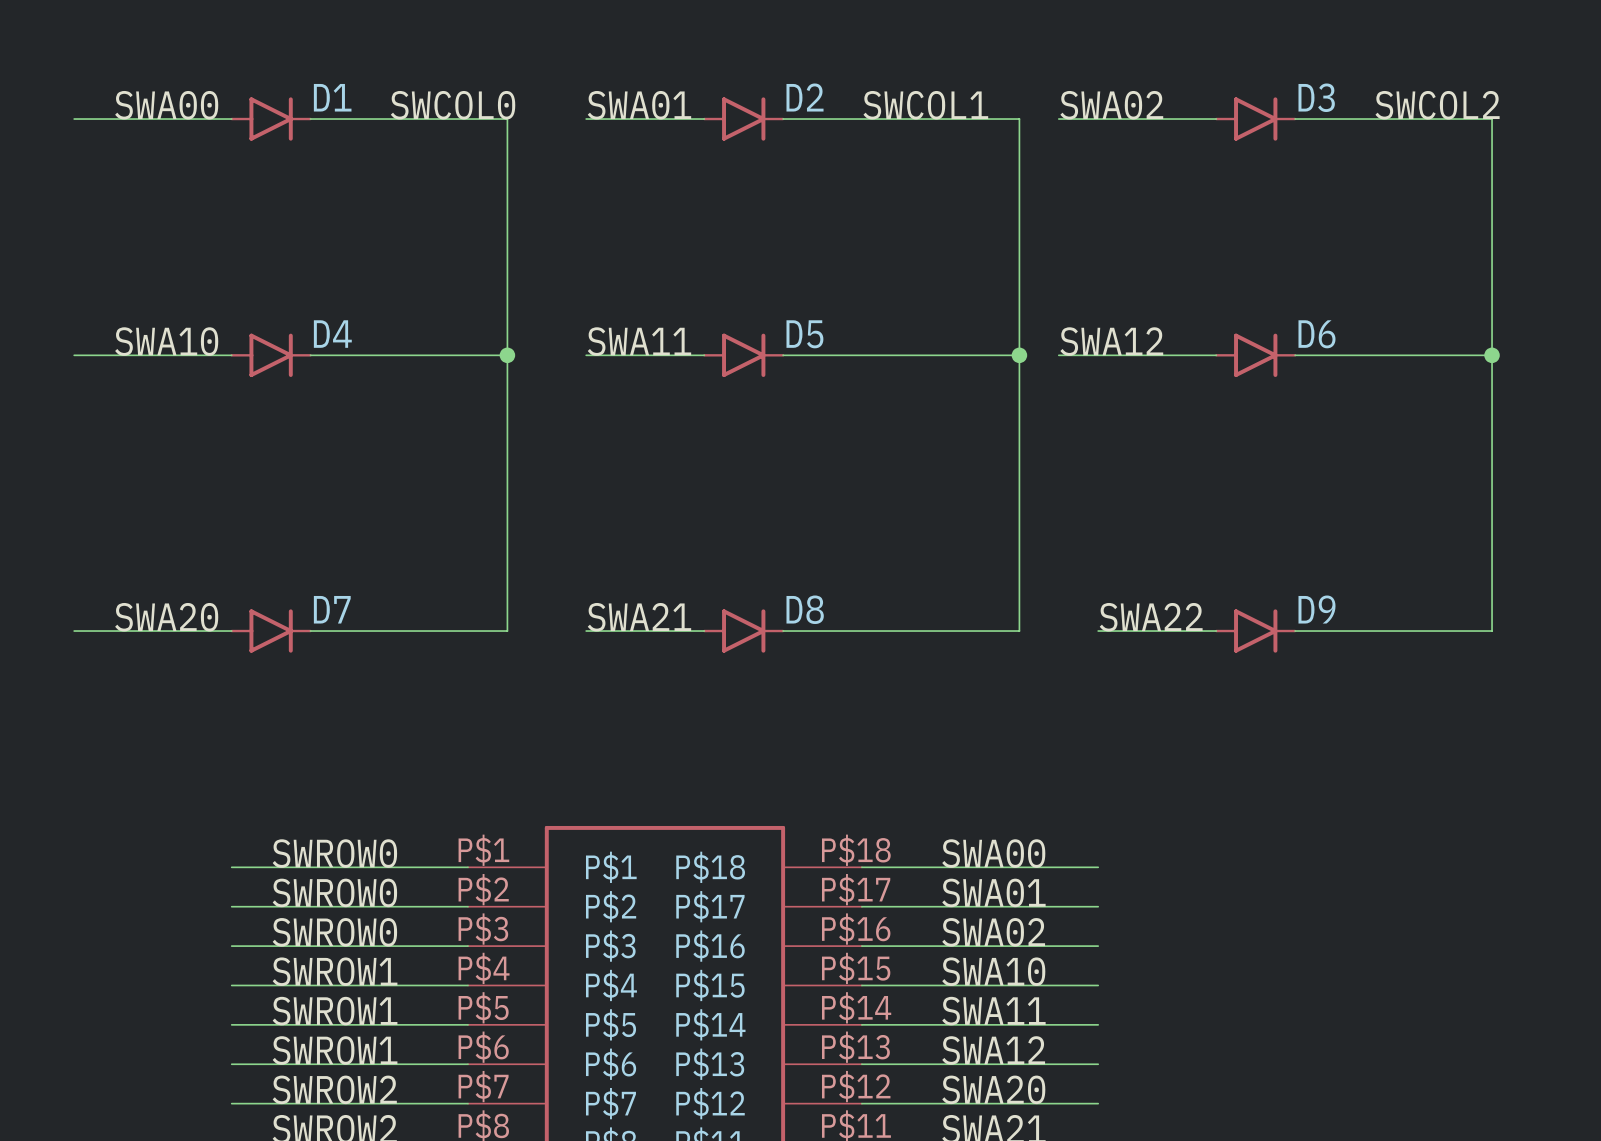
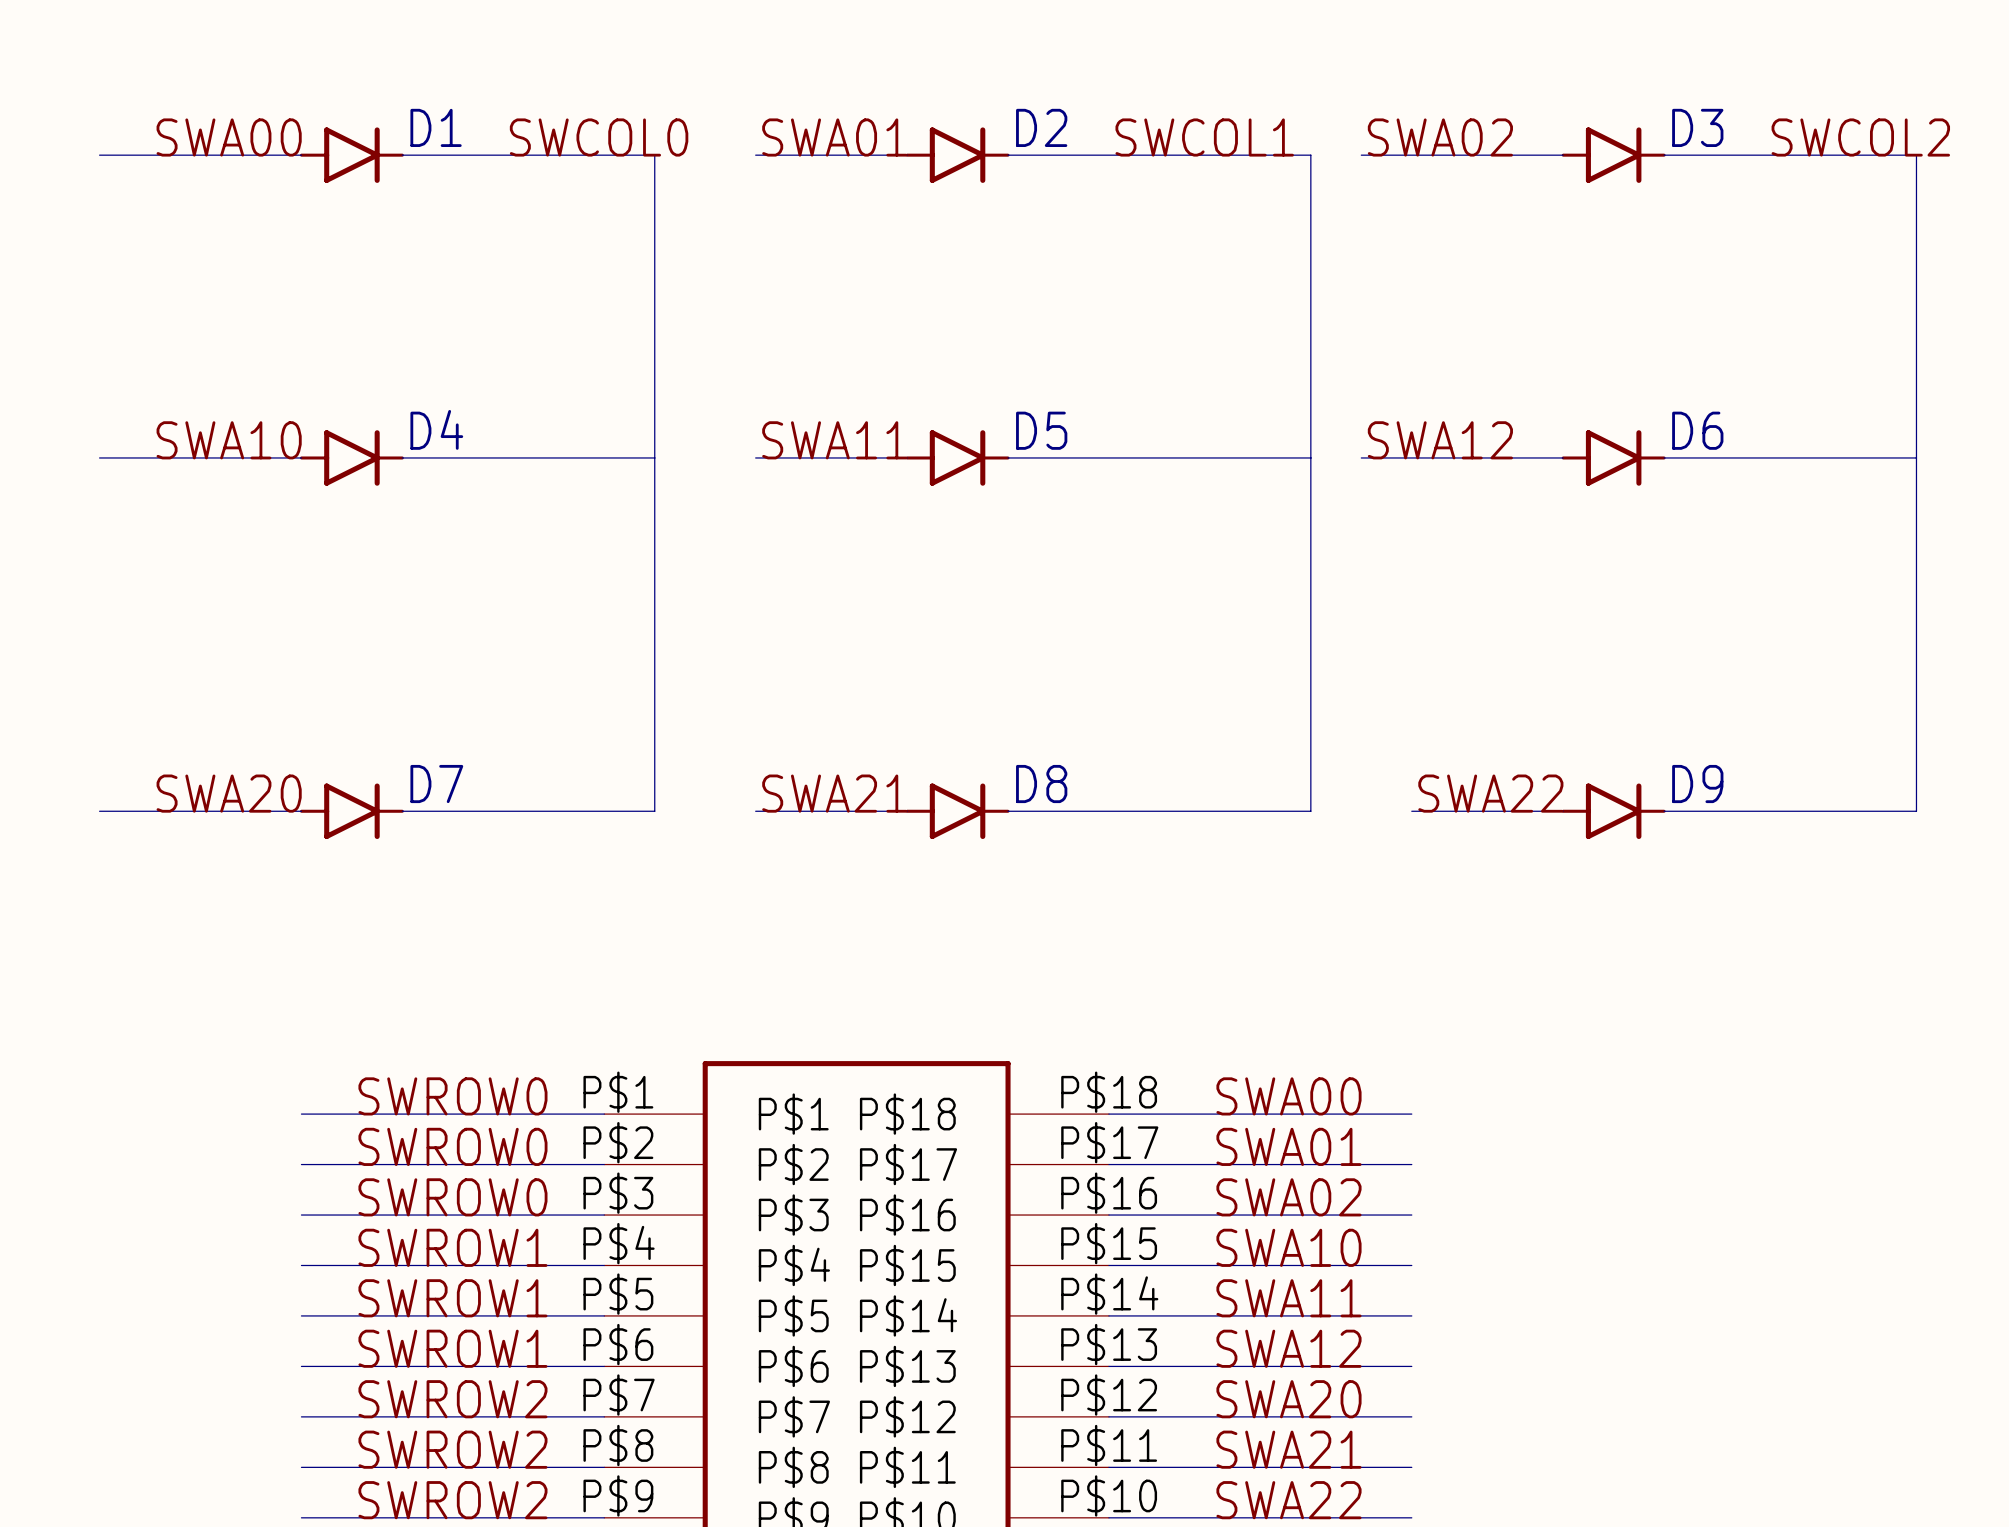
junction: (507, 355) -> none
junction: (1019, 355) -> none
junction: (1492, 355) -> none

